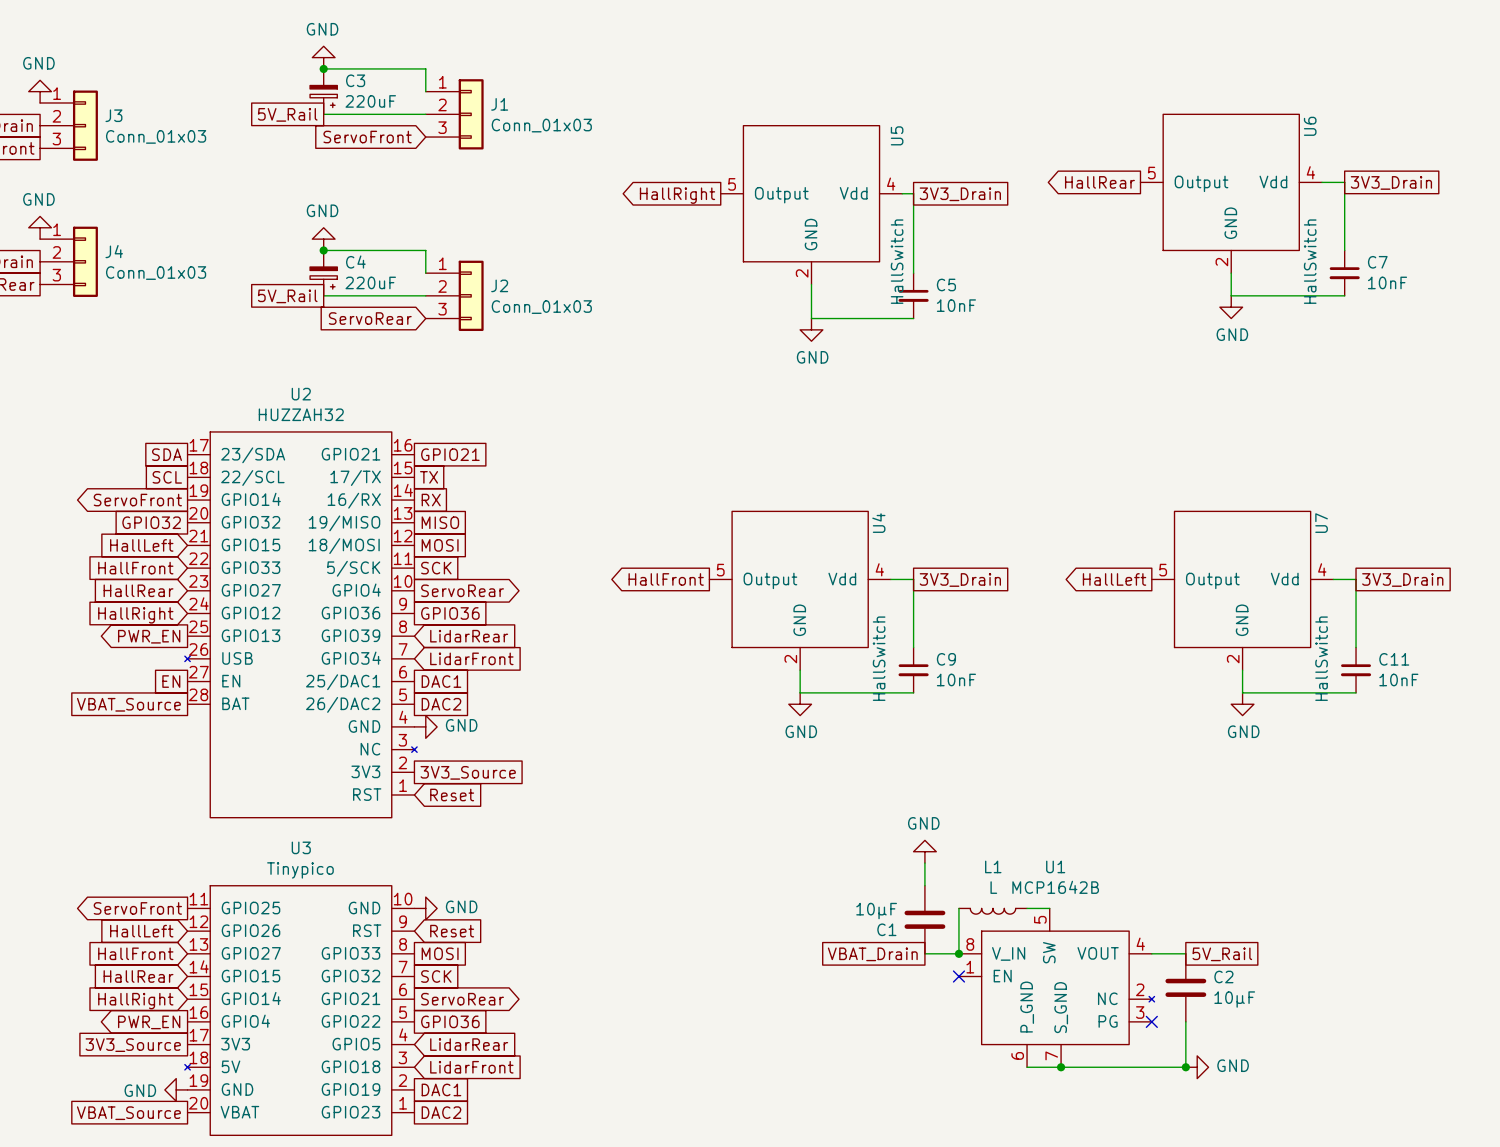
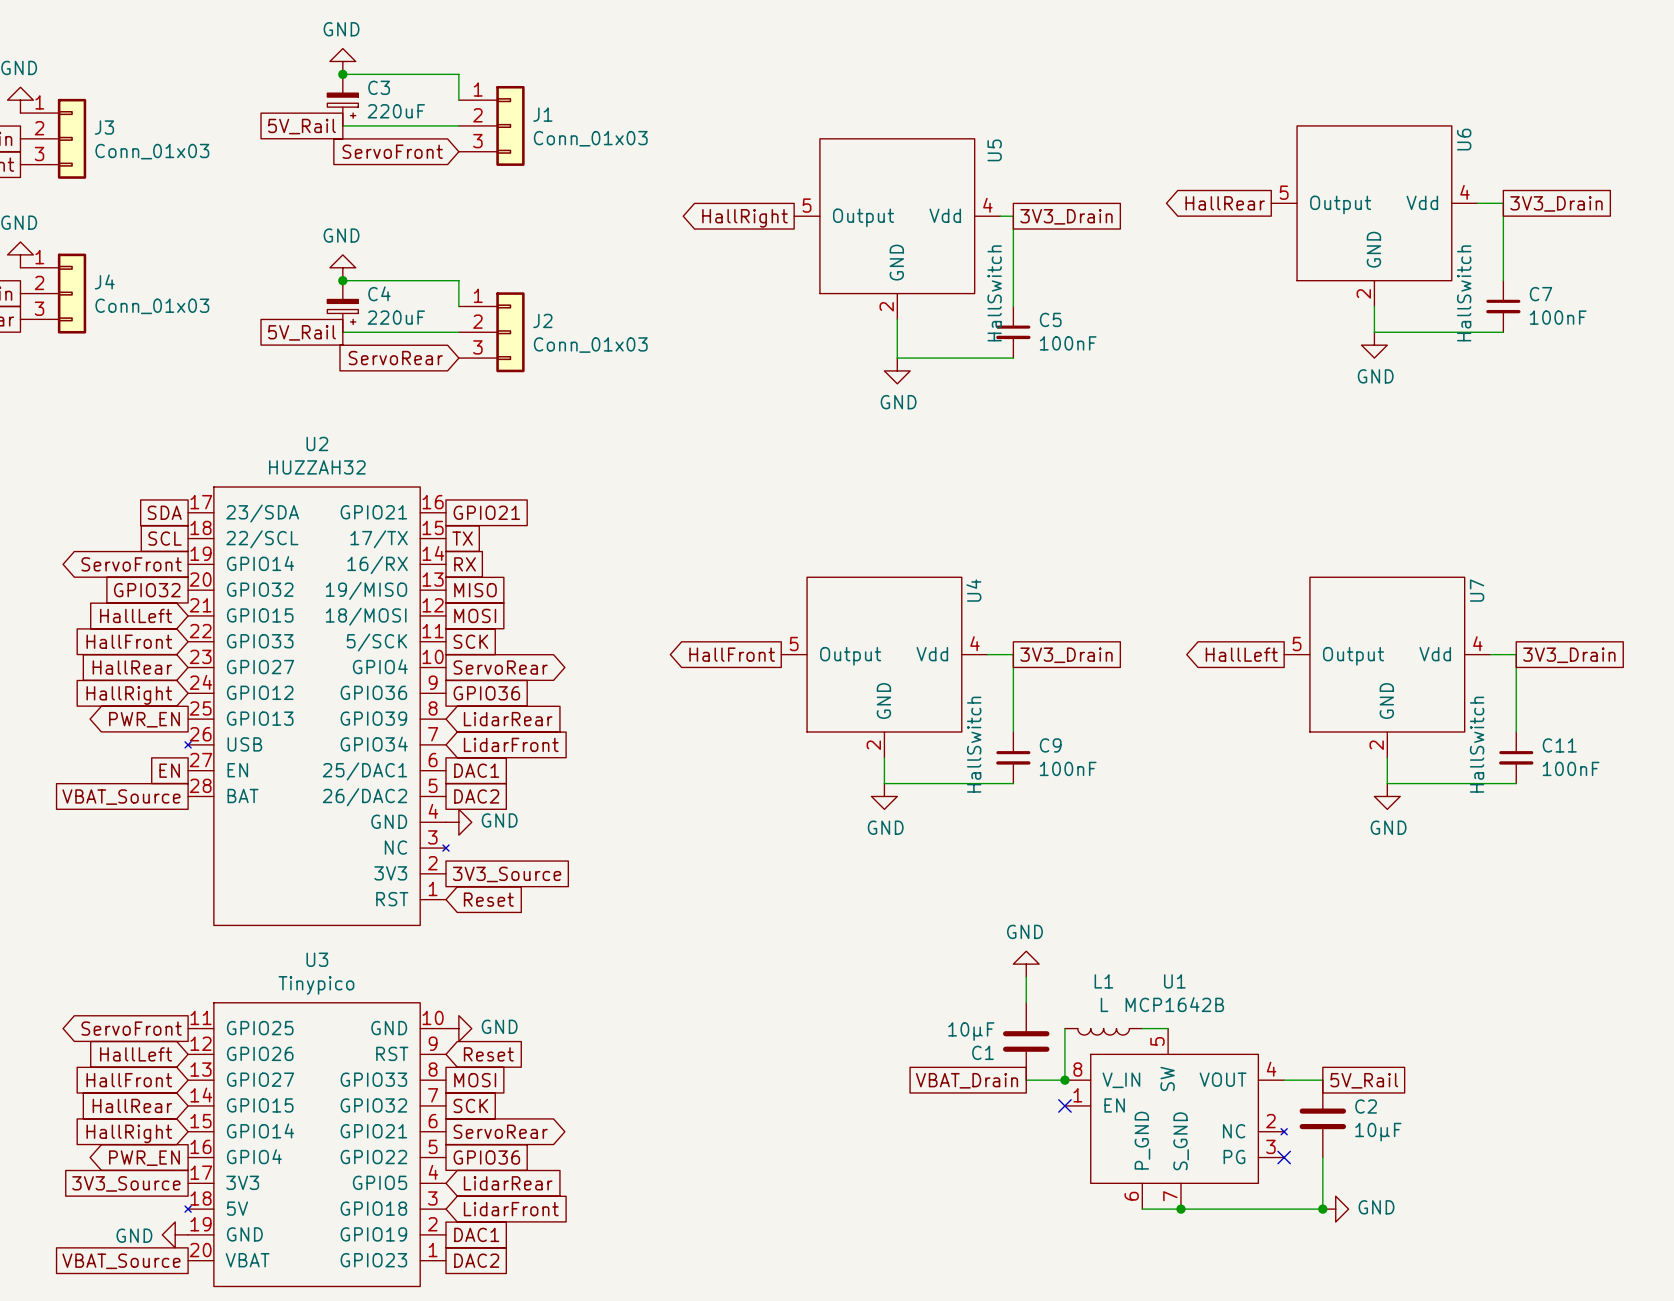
C7 value: 10nF (1387, 282) -> 100nF (1558, 317)
C5 value: 10nF (956, 305) -> 100nF (1068, 343)
C9 value: 10nF (956, 679) -> 100nF (1068, 768)
C11 value: 10nF (1398, 679) -> 100nF (1571, 768)

